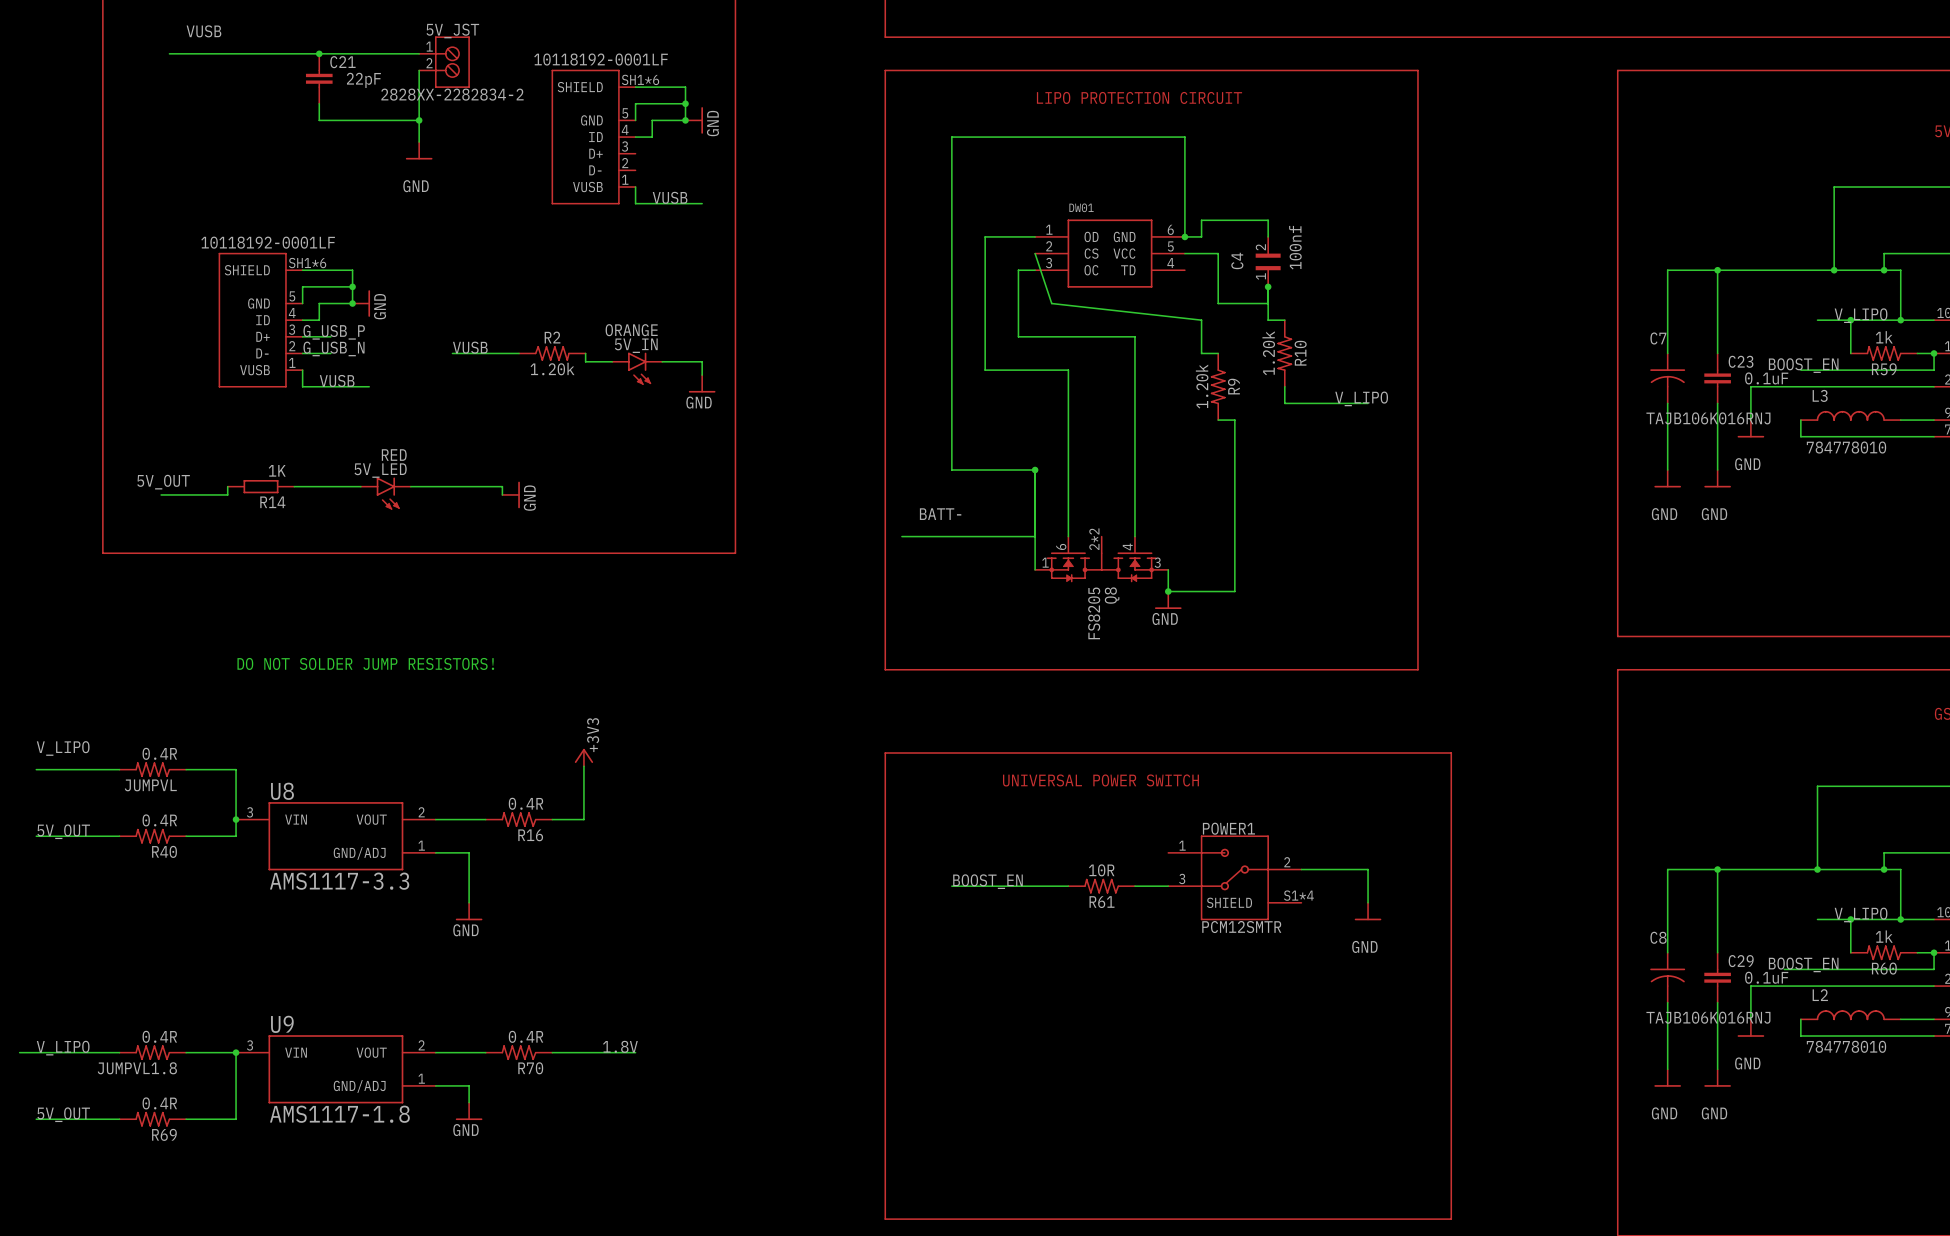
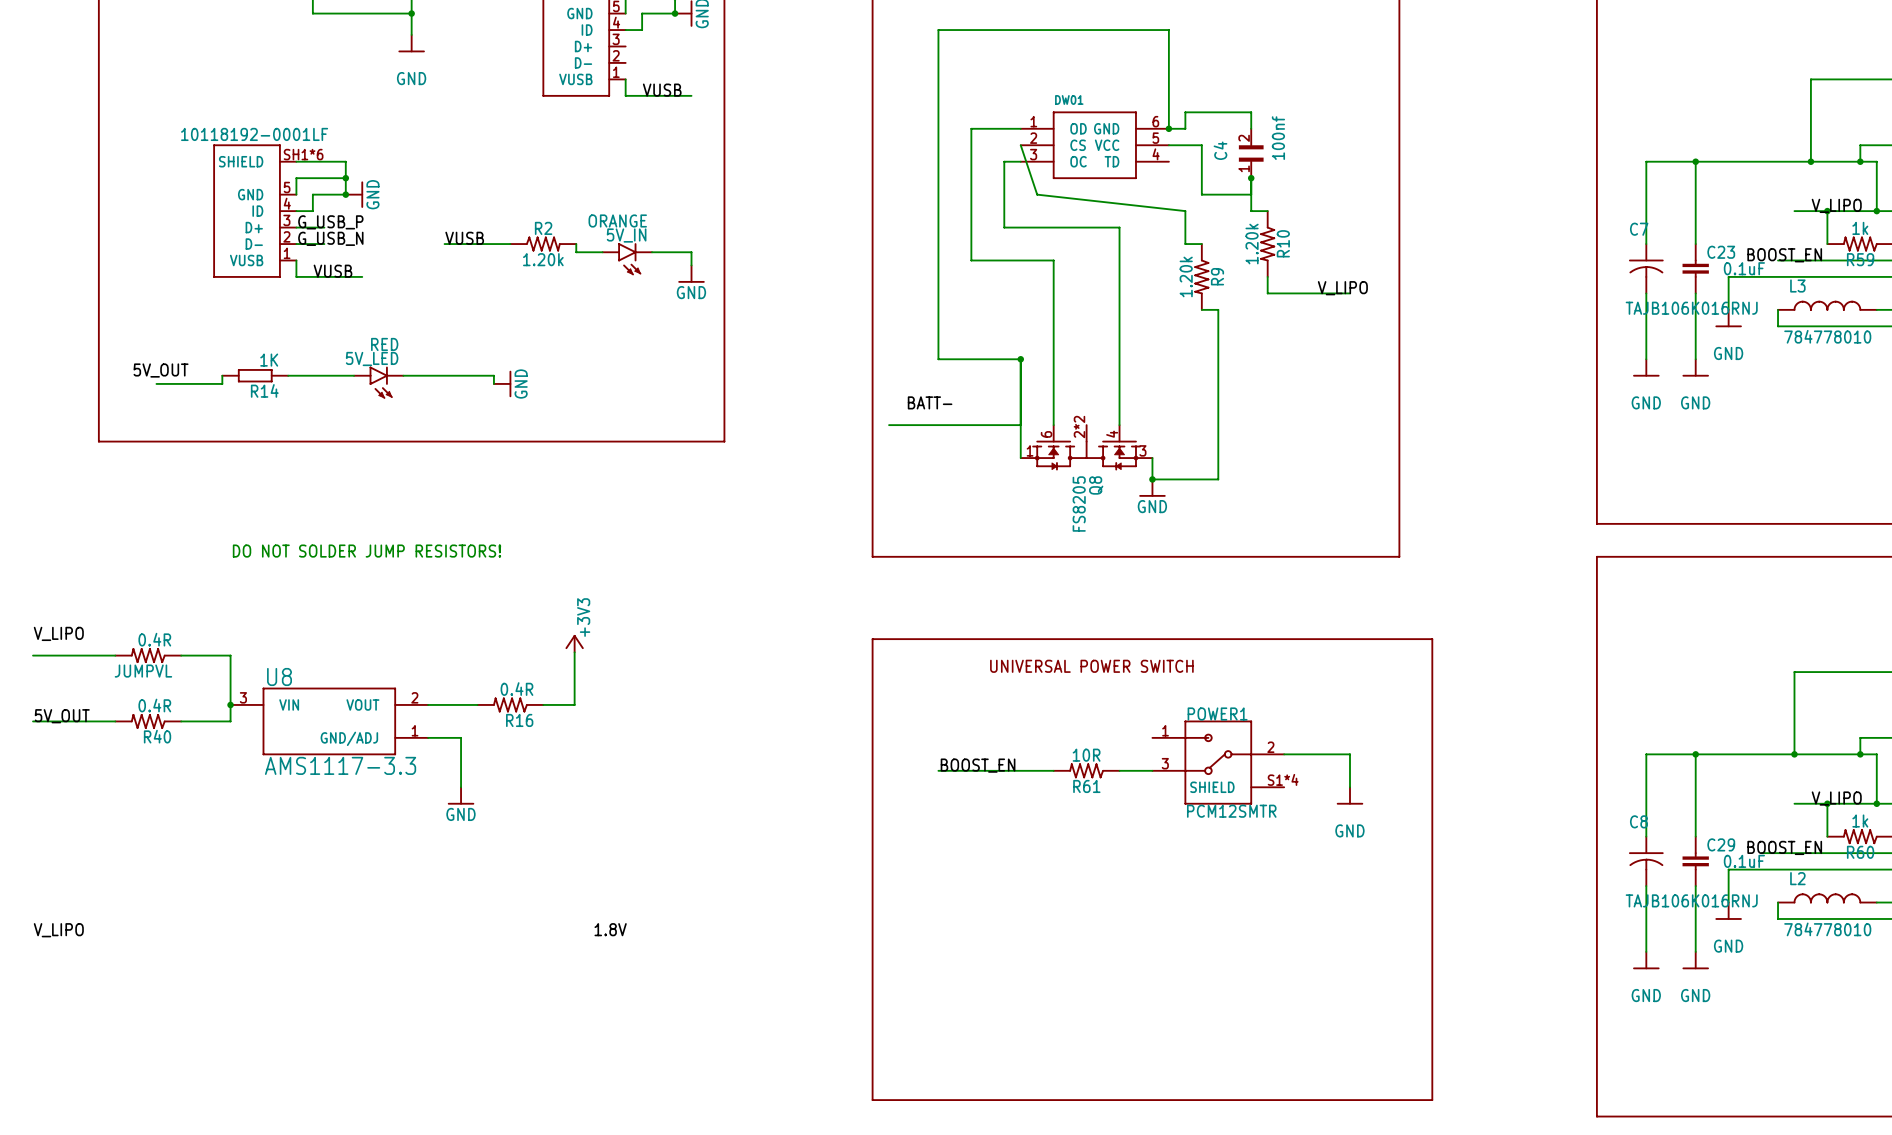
wire: (19, 1052) (119, 1052) -> none
JUMPVL1.8: 0.4R (152, 1052) -> none
wire: (186, 1052) (236, 1052) (236, 1119) (186, 1119) -> none
junction: (236, 1052) -> none
wire: (435, 1052) (485, 1052) -> none
R70: 0.4R (519, 1052) -> none
wire: (552, 1052) (635, 1052) -> none
U9: AMS1117-1.8 (335, 1069) -> none
wire: (435, 1085) (469, 1085) (469, 1102) -> none
power symbol: GND (469, 1111) -> none
label: 5V_OUT (63, 1114) -> none
wire: (36, 1119) (119, 1119) -> none
R69: 0.4R (152, 1119) -> none

